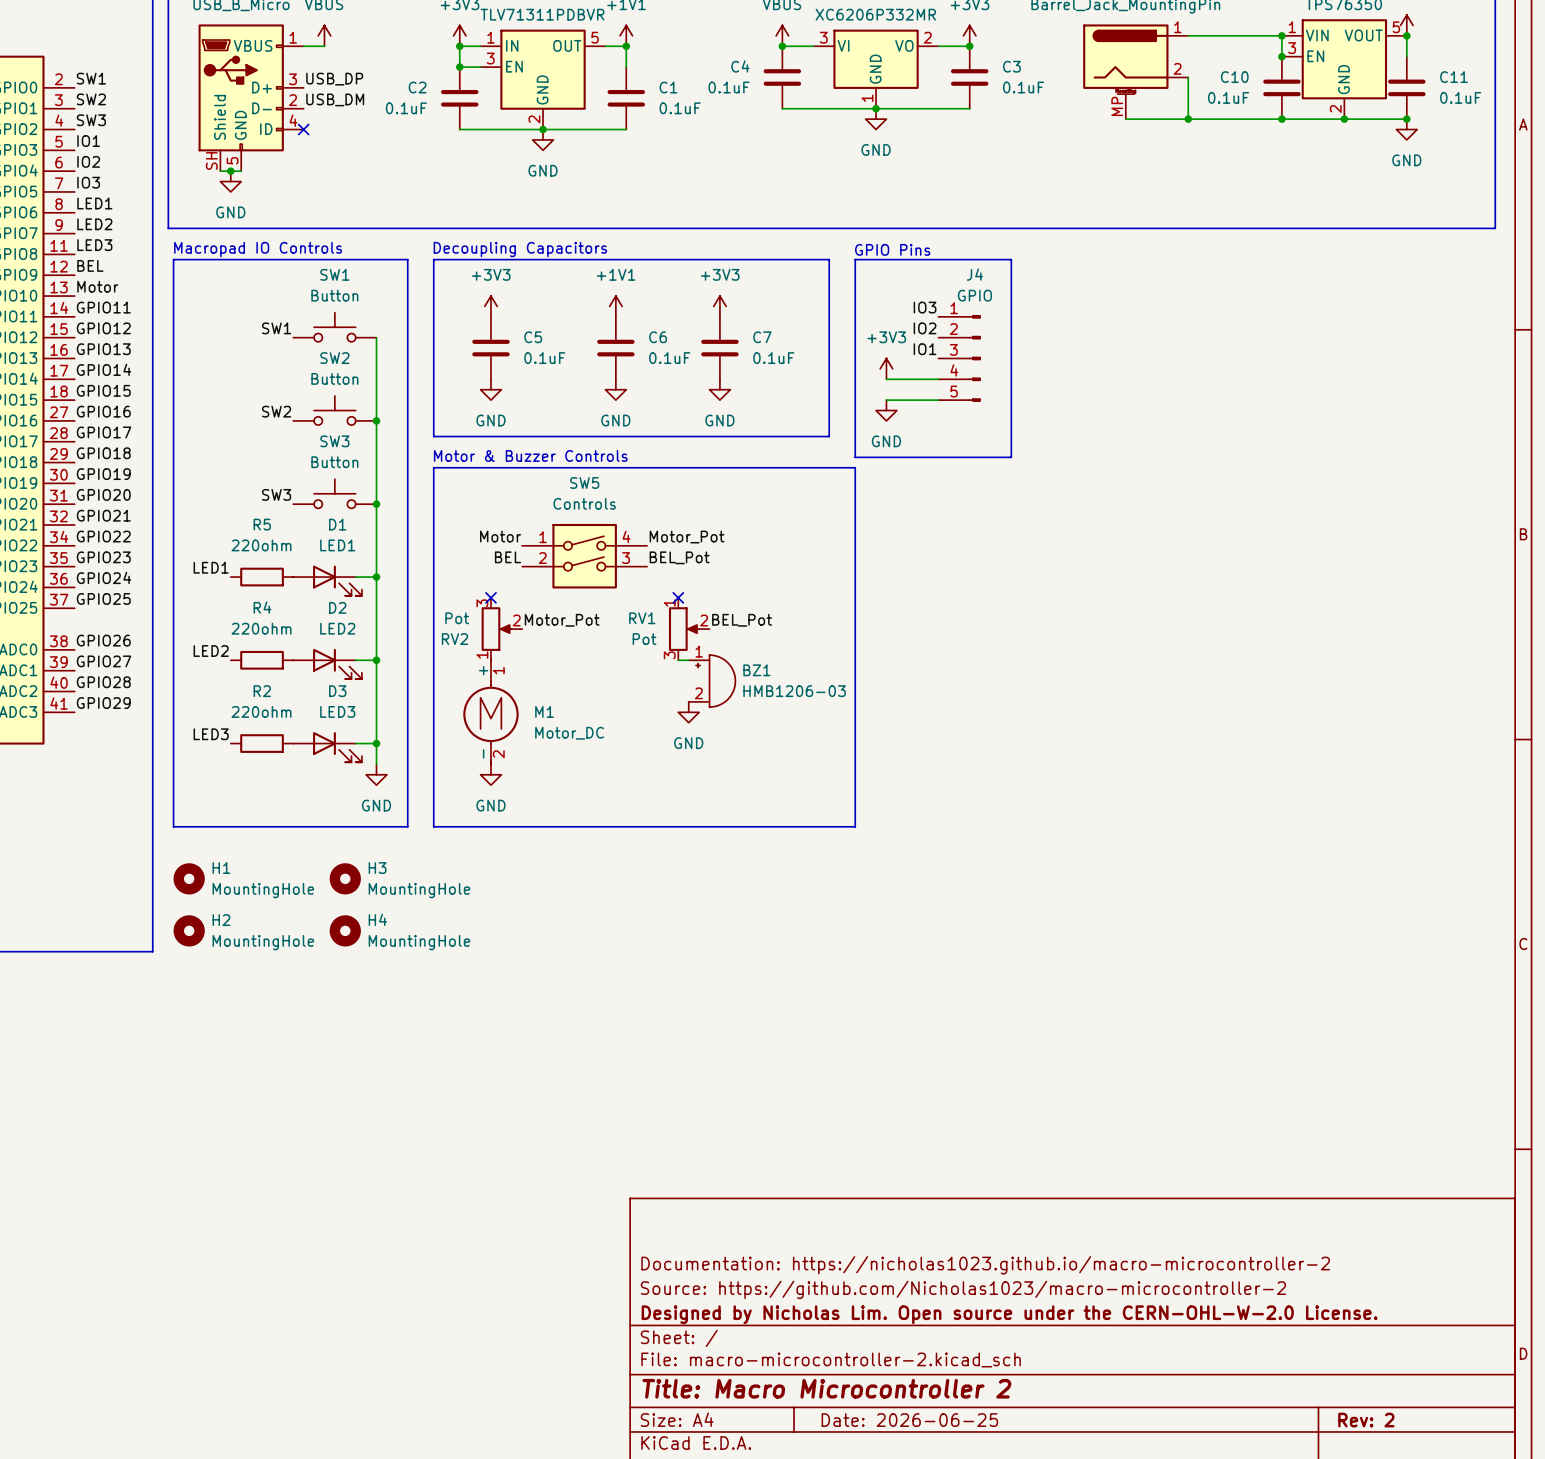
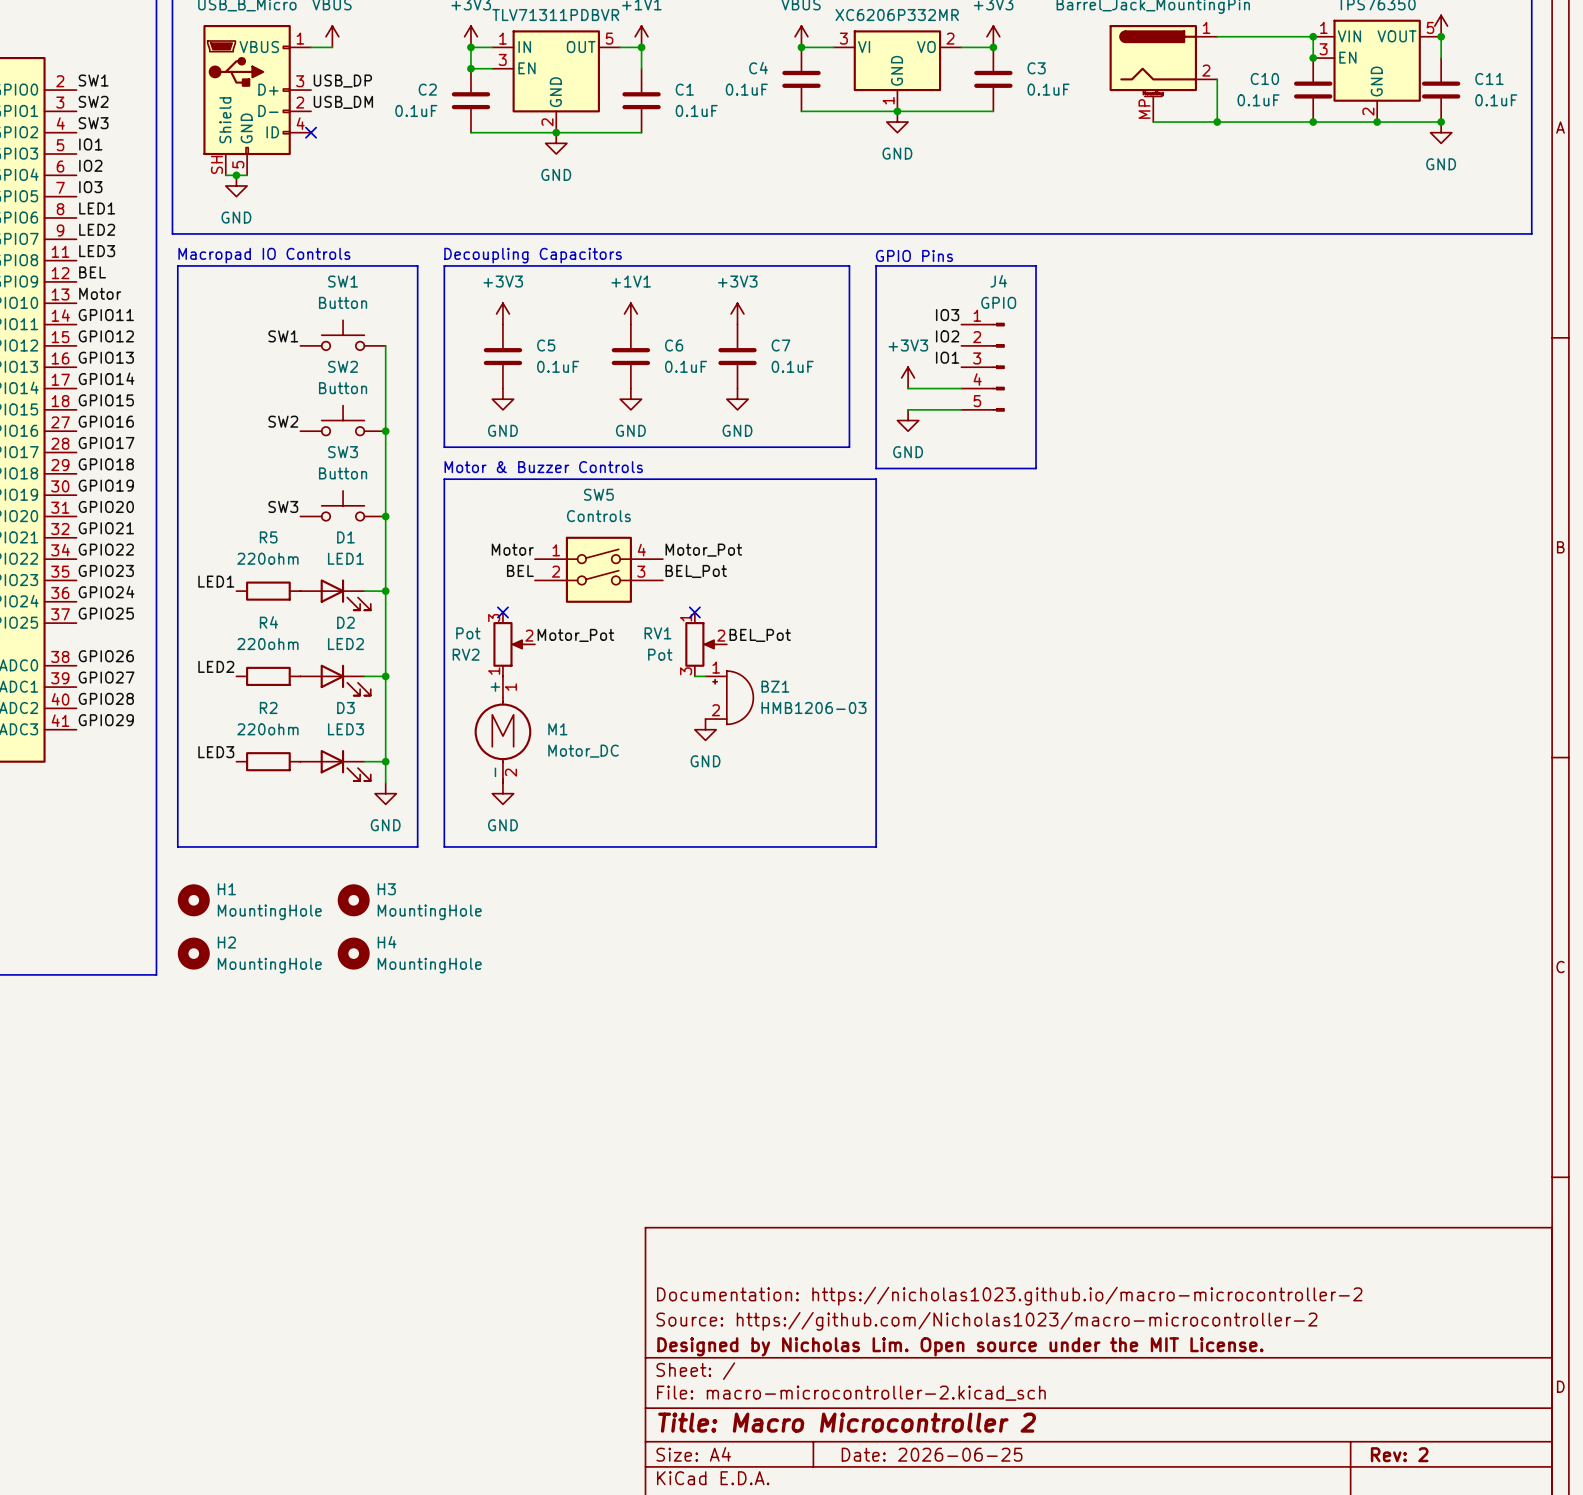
title block: Designed by Nicholas Lim. Open source under the CERN-OHL-W-2.0 License. (1009, 1314) -> Designed by Nicholas Lim. Open source under the MIT License. (960, 1346)

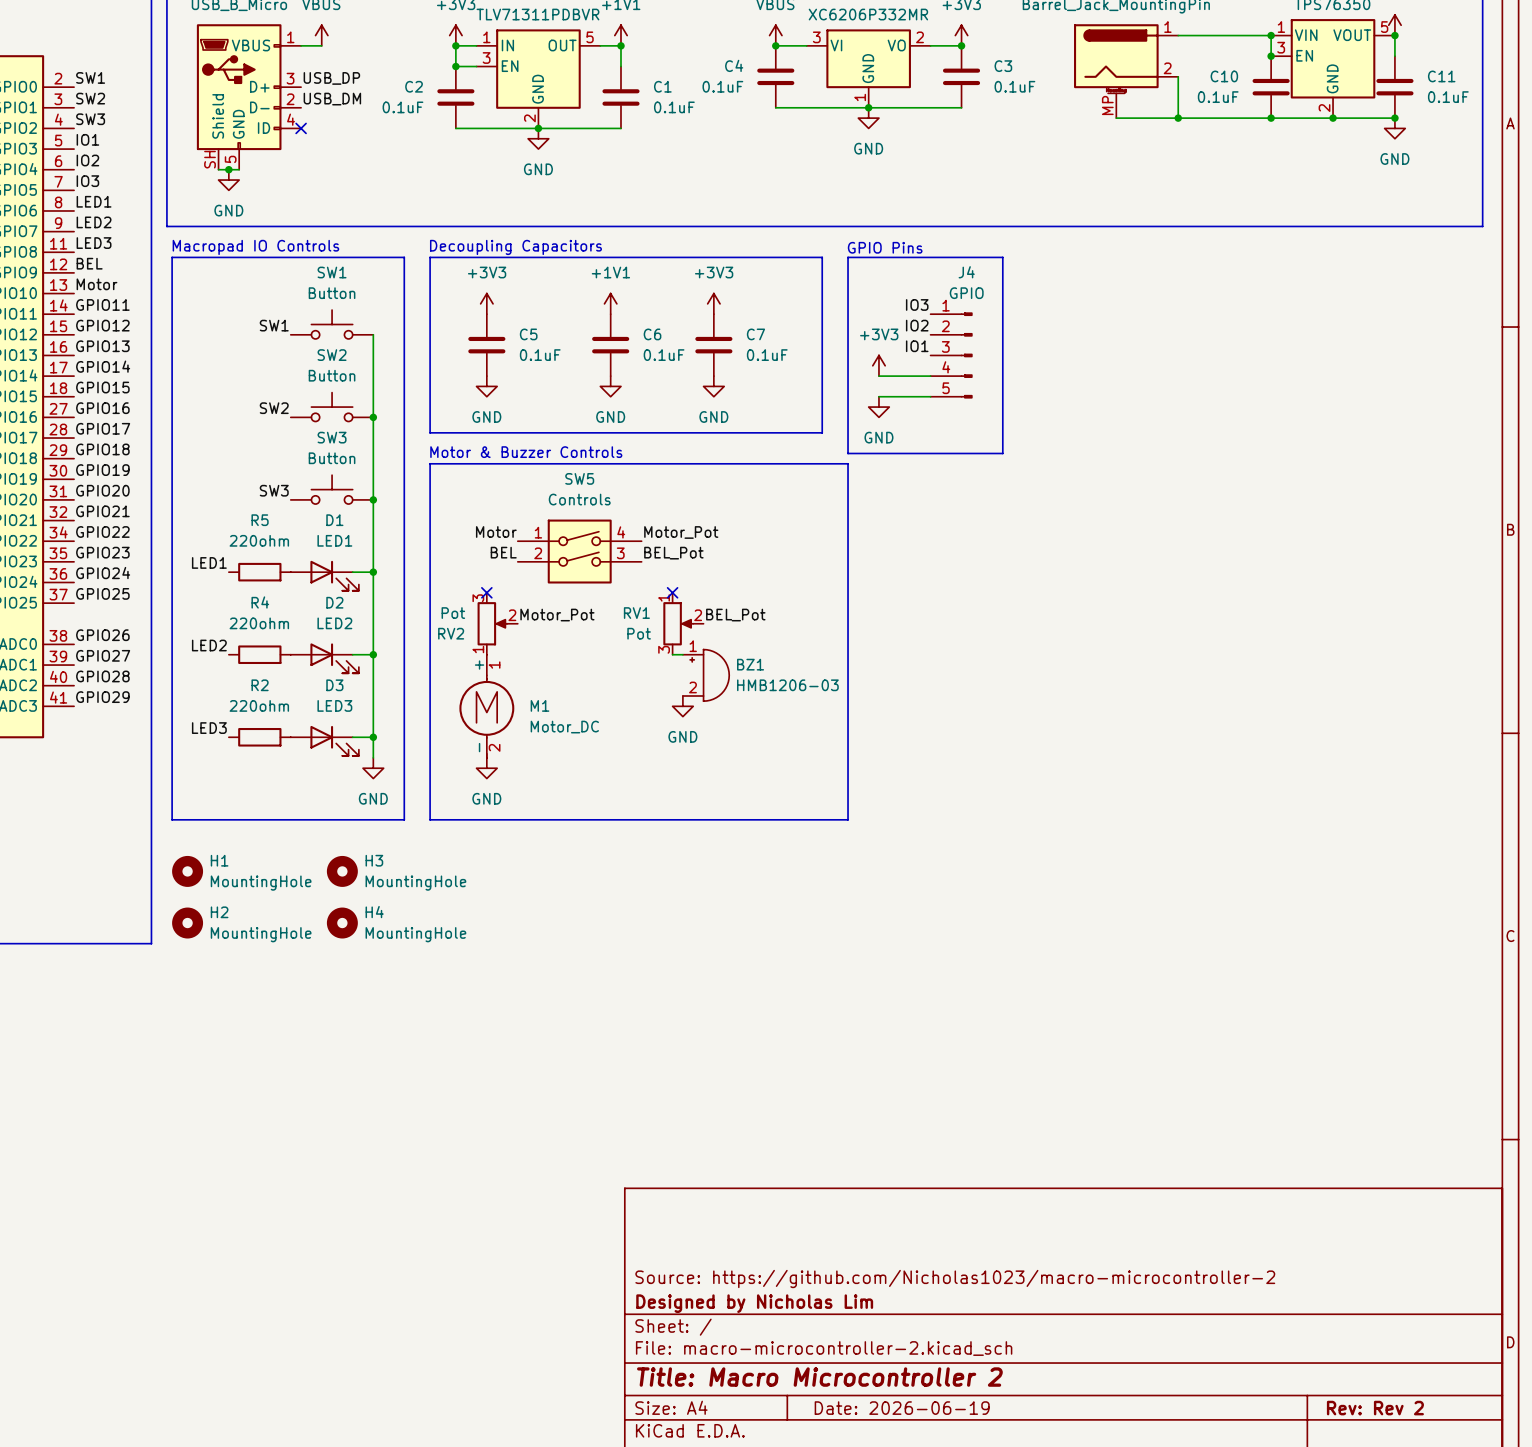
title block: Documentation: https://nicholas1023.github.io/macro-microcontroller-2 (1009, 1296) -> none
title block: Designed by Nicholas Lim. Open source under the MIT License. (960, 1346) -> Designed by Nicholas Lim (754, 1303)
title block: Date: 2026-06-25 (932, 1454) -> Date: 2026-06-19 (902, 1408)
title block: Rev: 2 (1399, 1454) -> Rev: Rev 2 (1375, 1408)

